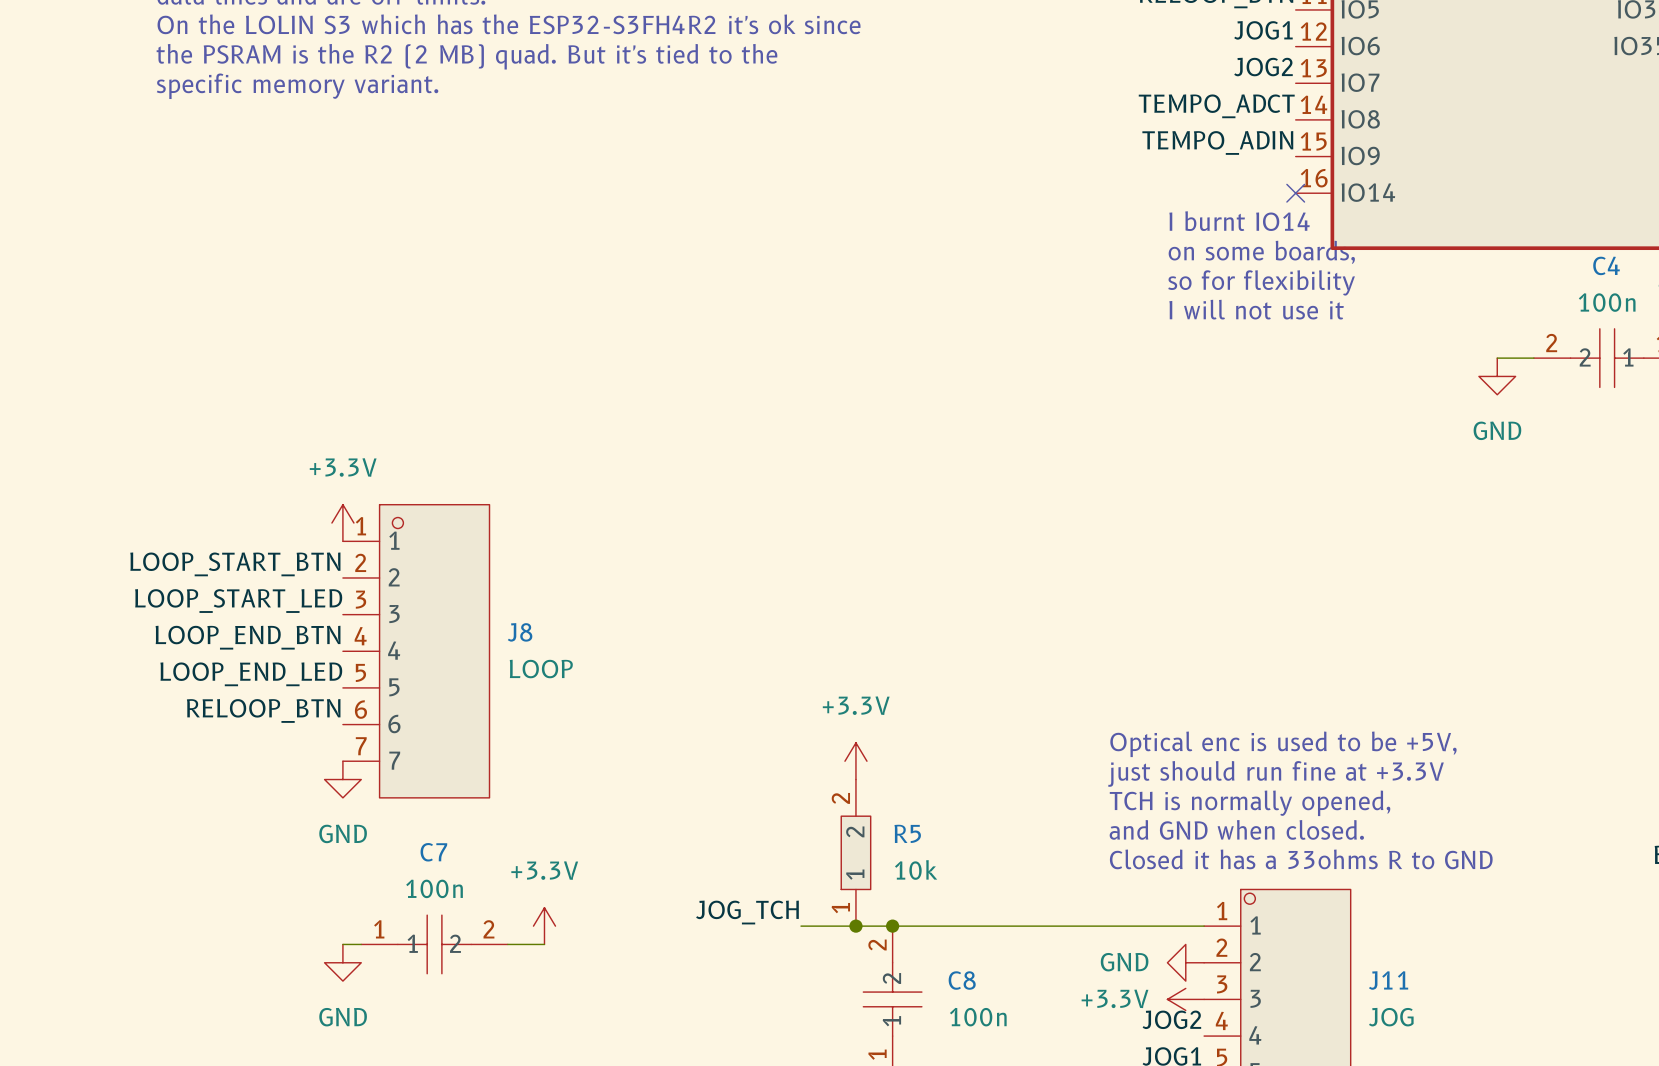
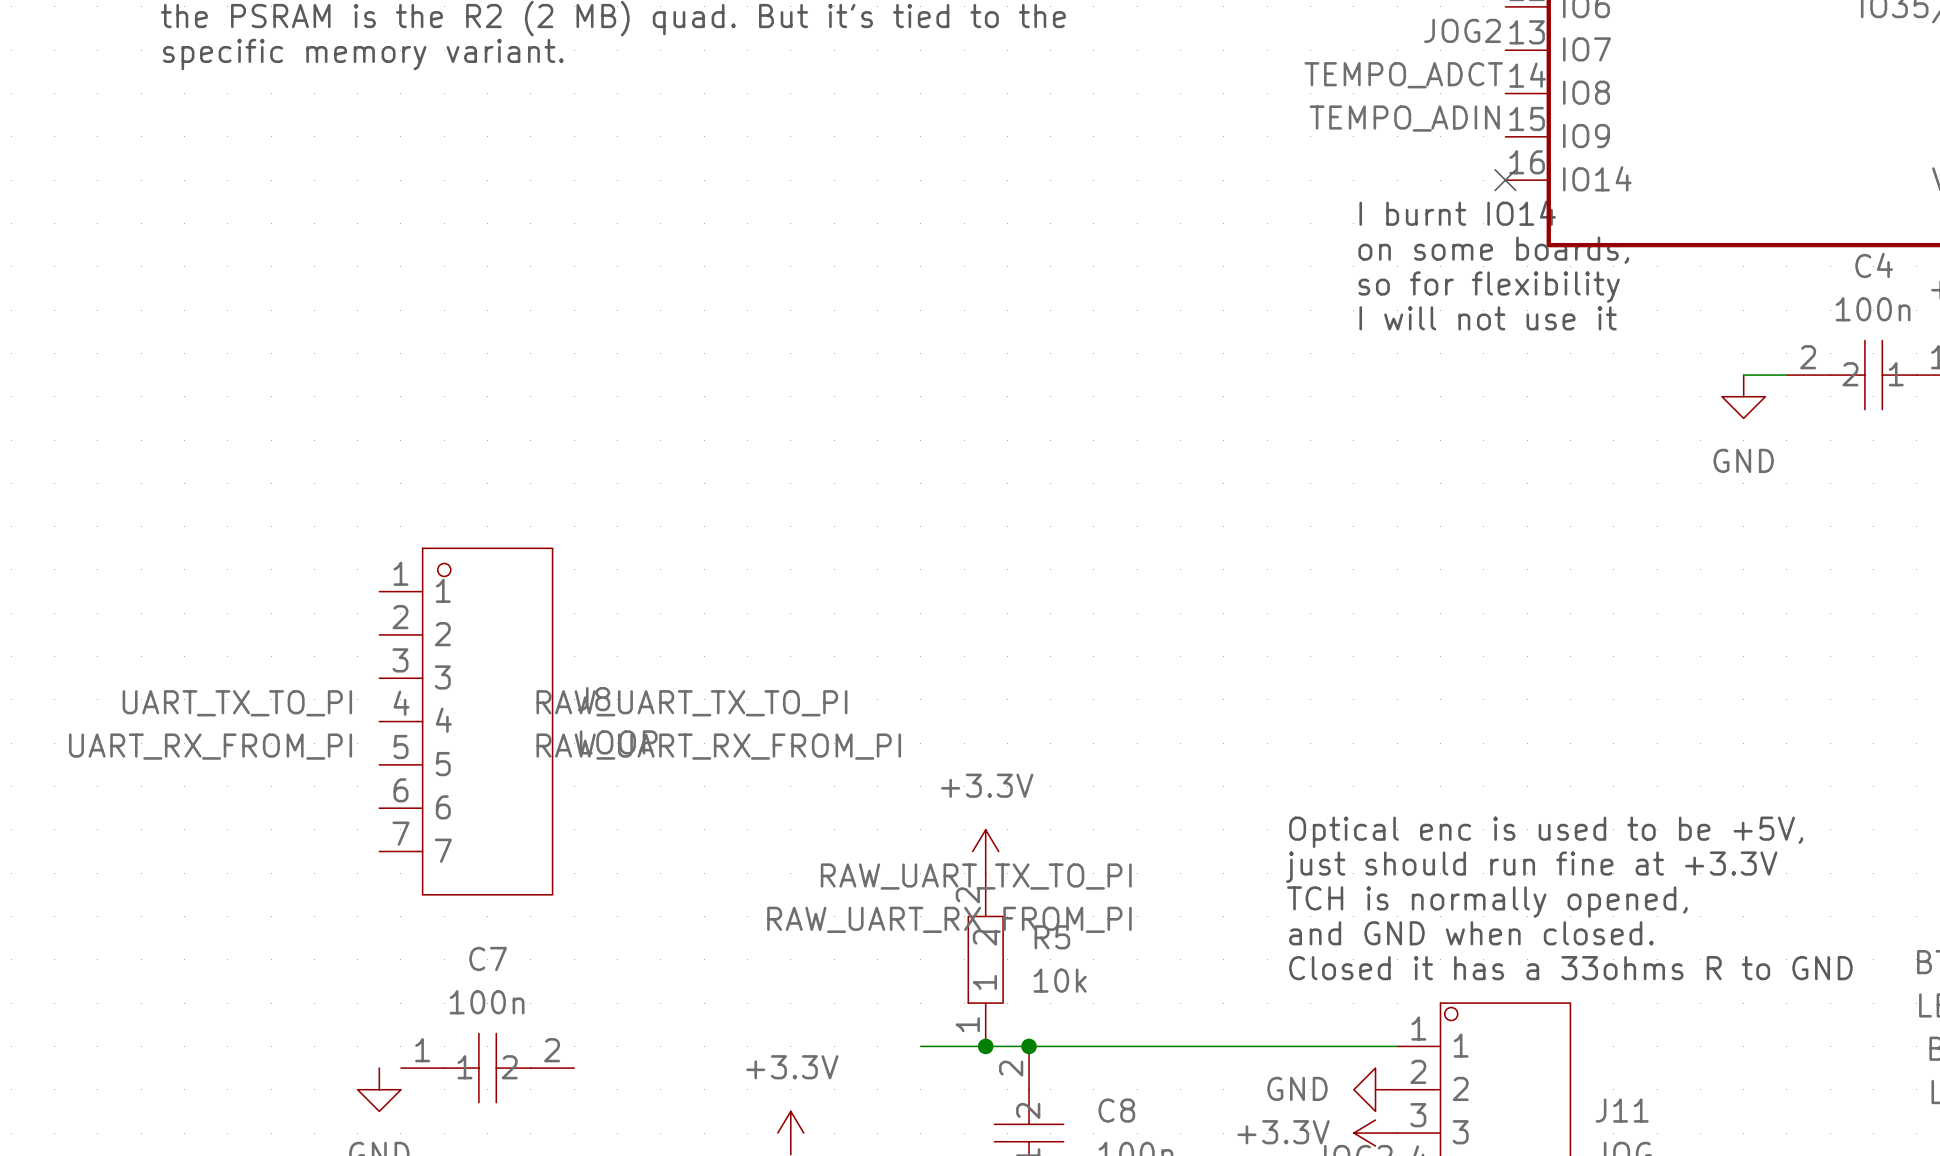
power symbol: +3.3V (342, 523) -> none
label: LOOP_START_BTN (235, 564) -> none
label: LOOP_START_LED (238, 601) -> none
label: none -> UART_TX_TO_PI (237, 703)
label: LOOP_END_BTN (248, 637) -> none
label: none -> RAW_UART_TX_TO_PI (691, 703)
label: none -> UART_RX_FROM_PI (210, 746)
label: LOOP_END_LED (251, 674) -> none
label: none -> RAW_UART_RX_FROM_PI (718, 746)
label: RELOOP_BTN (263, 710) -> none
power symbol: GND (342, 779) -> none
label: none -> RAW_UART_TX_TO_PI (976, 876)
label: none -> RAW_UART_RX_FROM_PI (949, 919)
label: JOG_TCH (747, 912) -> none
power symbol position: +3.3V (544, 926) -> +3.3V (790, 1133)
wire: (342, 944) (361, 944) -> none
wire: (507, 944) (544, 944) -> none

